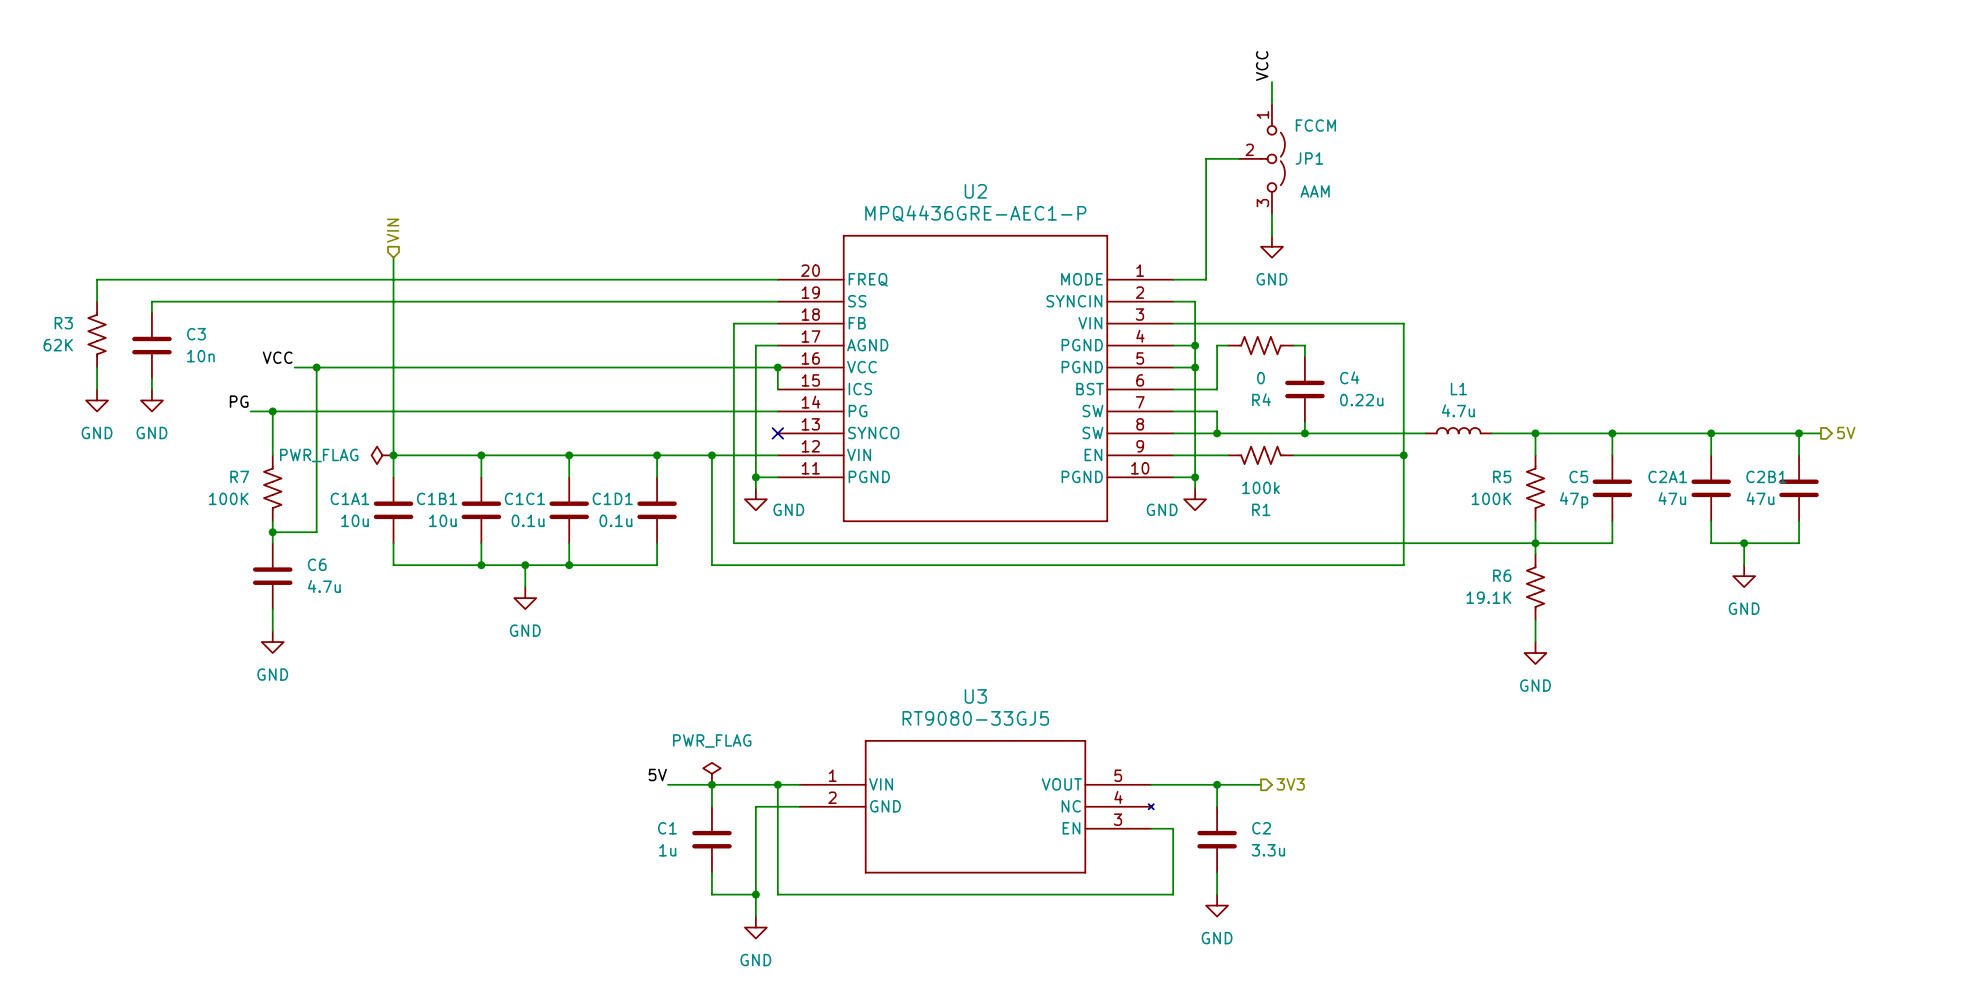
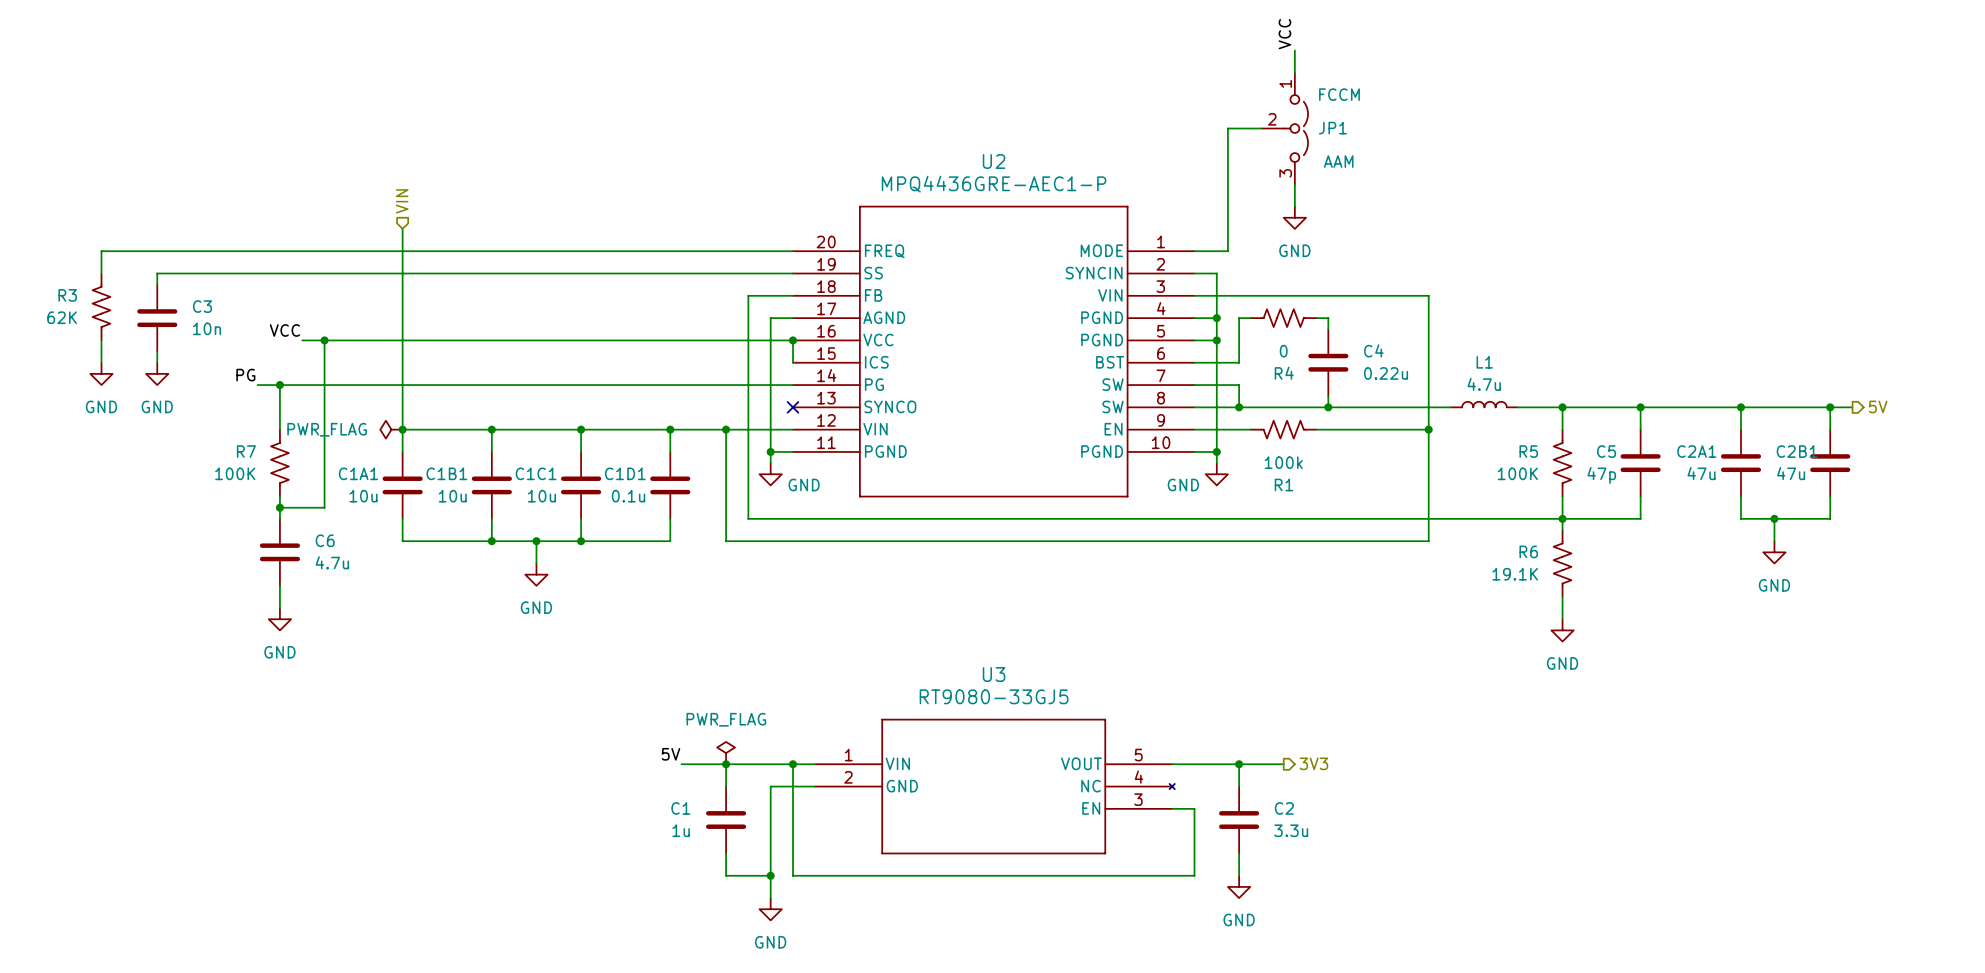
C1C1 value: 0.1u (528, 520) -> 10u (541, 496)

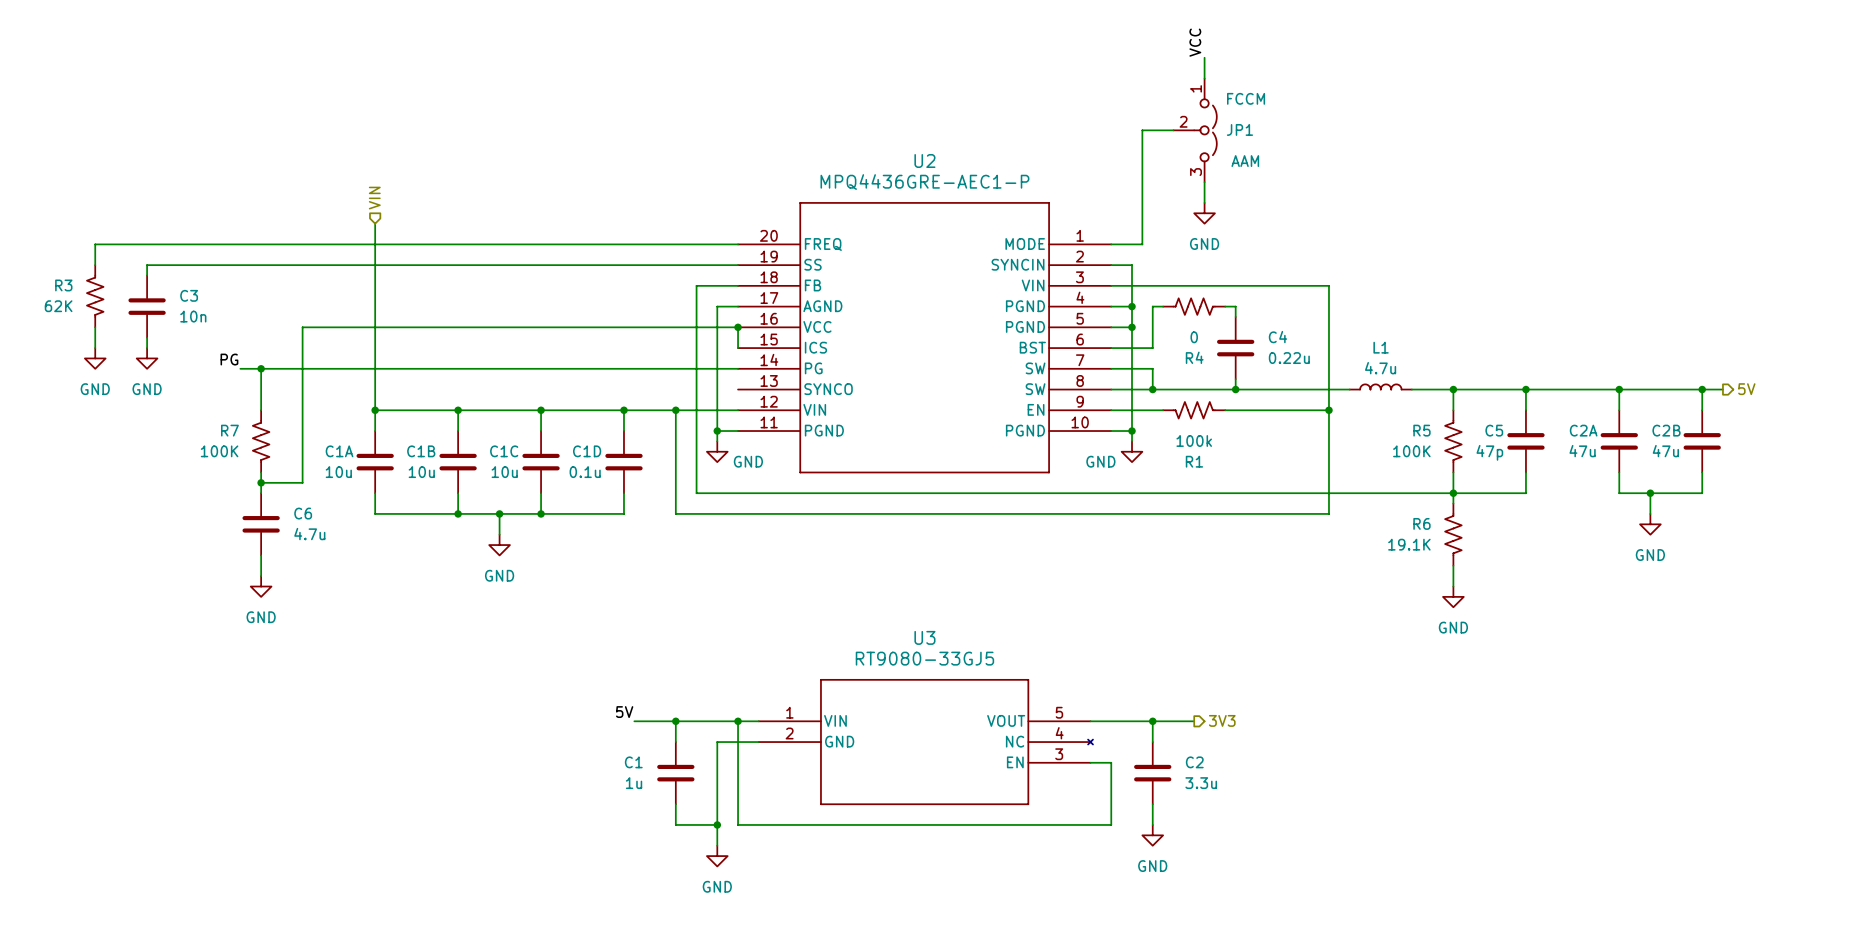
label: VCC (284, 330) -> none
wire: (302, 340) (324, 340) -> none
junction: (324, 340) -> none
no-connect mark: (792, 407) -> none
power symbol: PWR_FLAG (391, 429) -> none
C2A1 name: C2A1 (1696, 451) -> C2A (1583, 430)
C2B1 name: C2B1 (1797, 451) -> C2B (1666, 430)
C1A1 name: C1A1 (358, 473) -> C1A (339, 451)
C1B1 name: C1B1 (446, 473) -> C1B (421, 451)
C1C1 name: C1C1 (536, 473) -> C1C (504, 451)
C1D1 name: C1D1 (625, 473) -> C1D (587, 451)
power symbol: PWR_FLAG (726, 753) -> none

